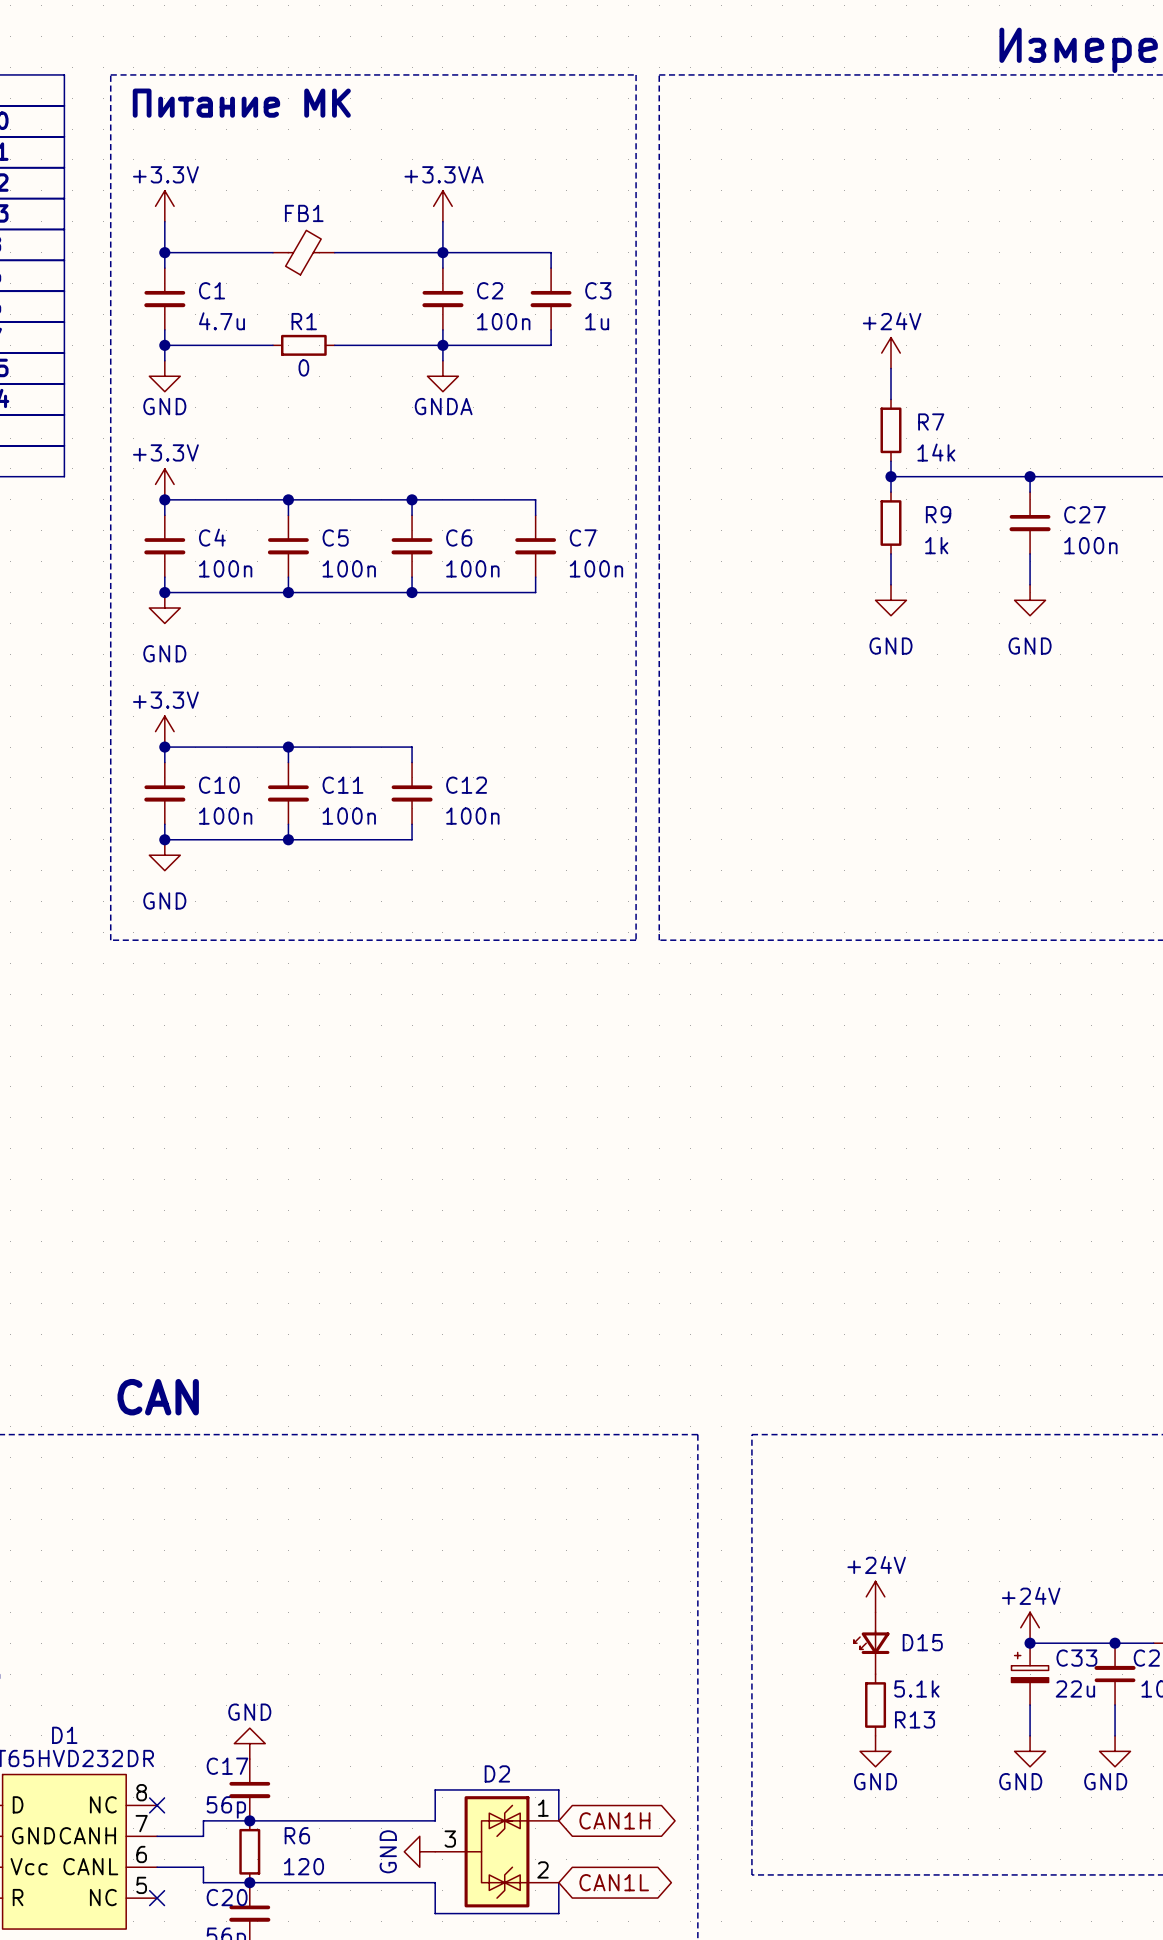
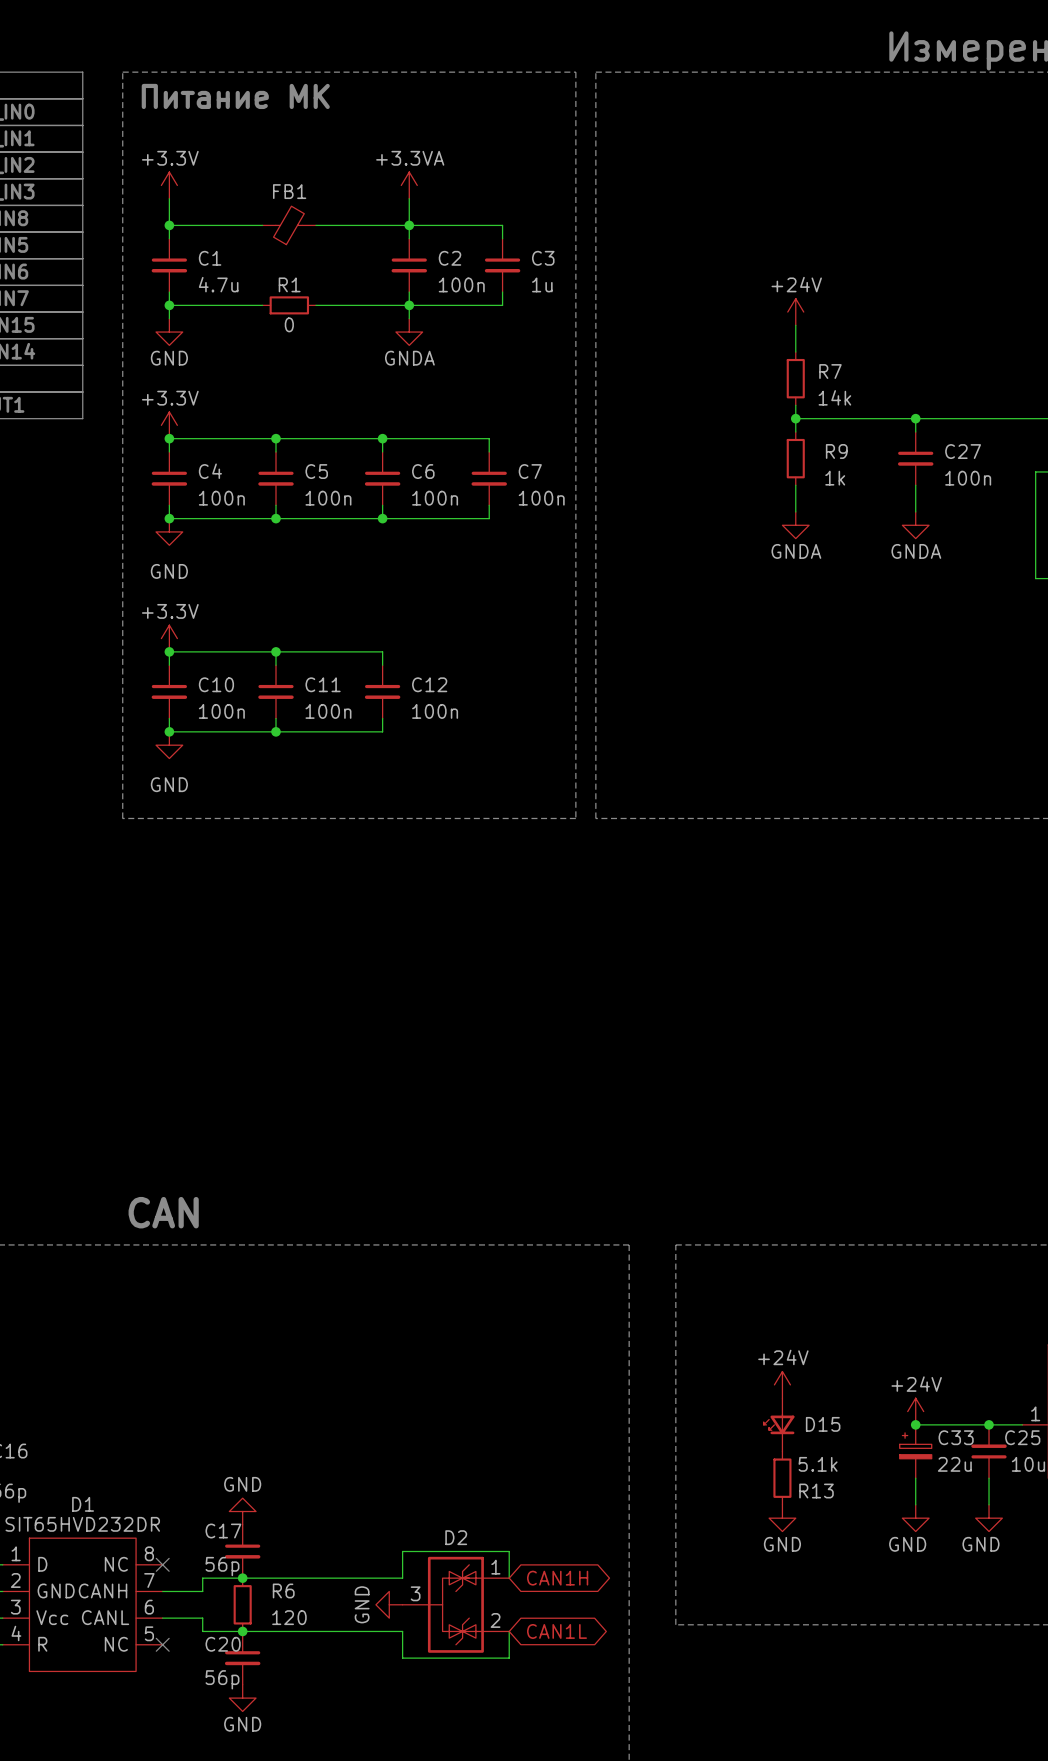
power symbol: GND (891, 600) -> GNDA (795, 525)
power symbol: GND (1030, 600) -> GNDA (915, 525)

